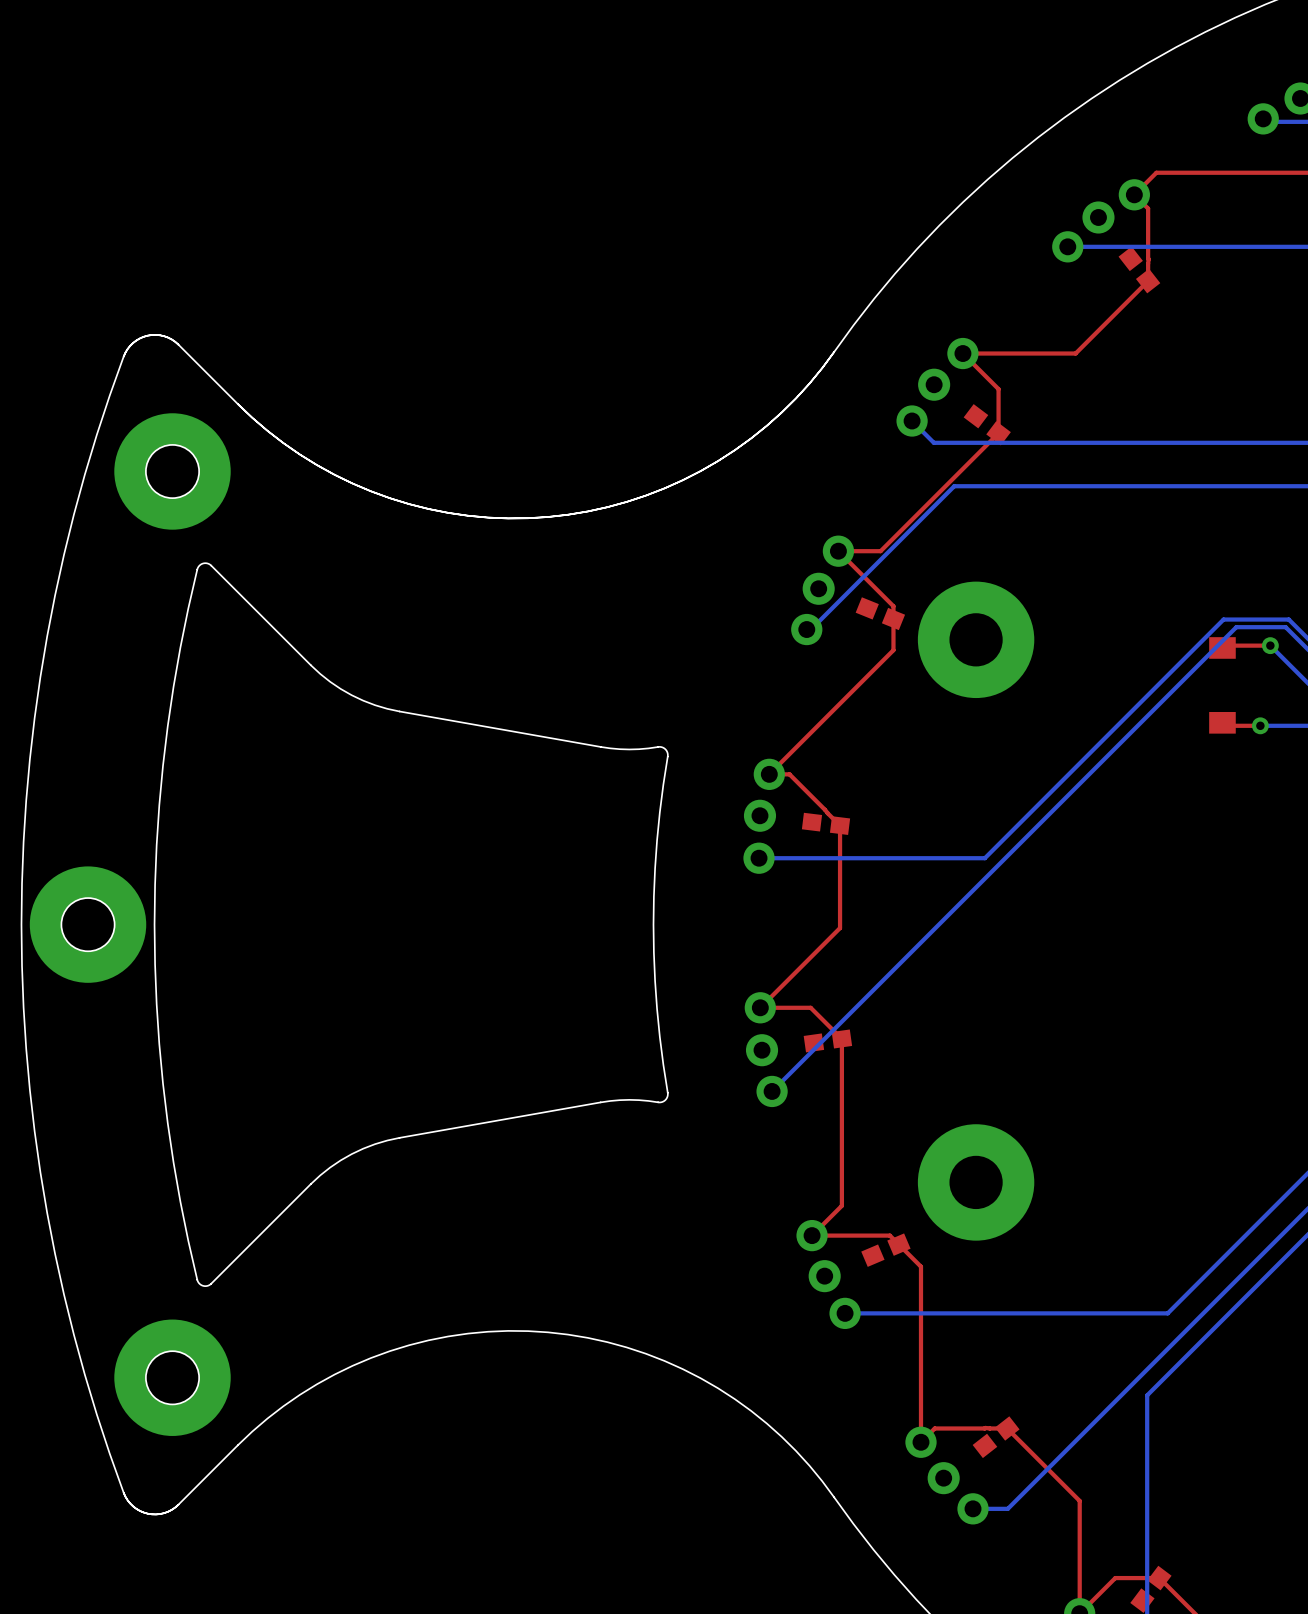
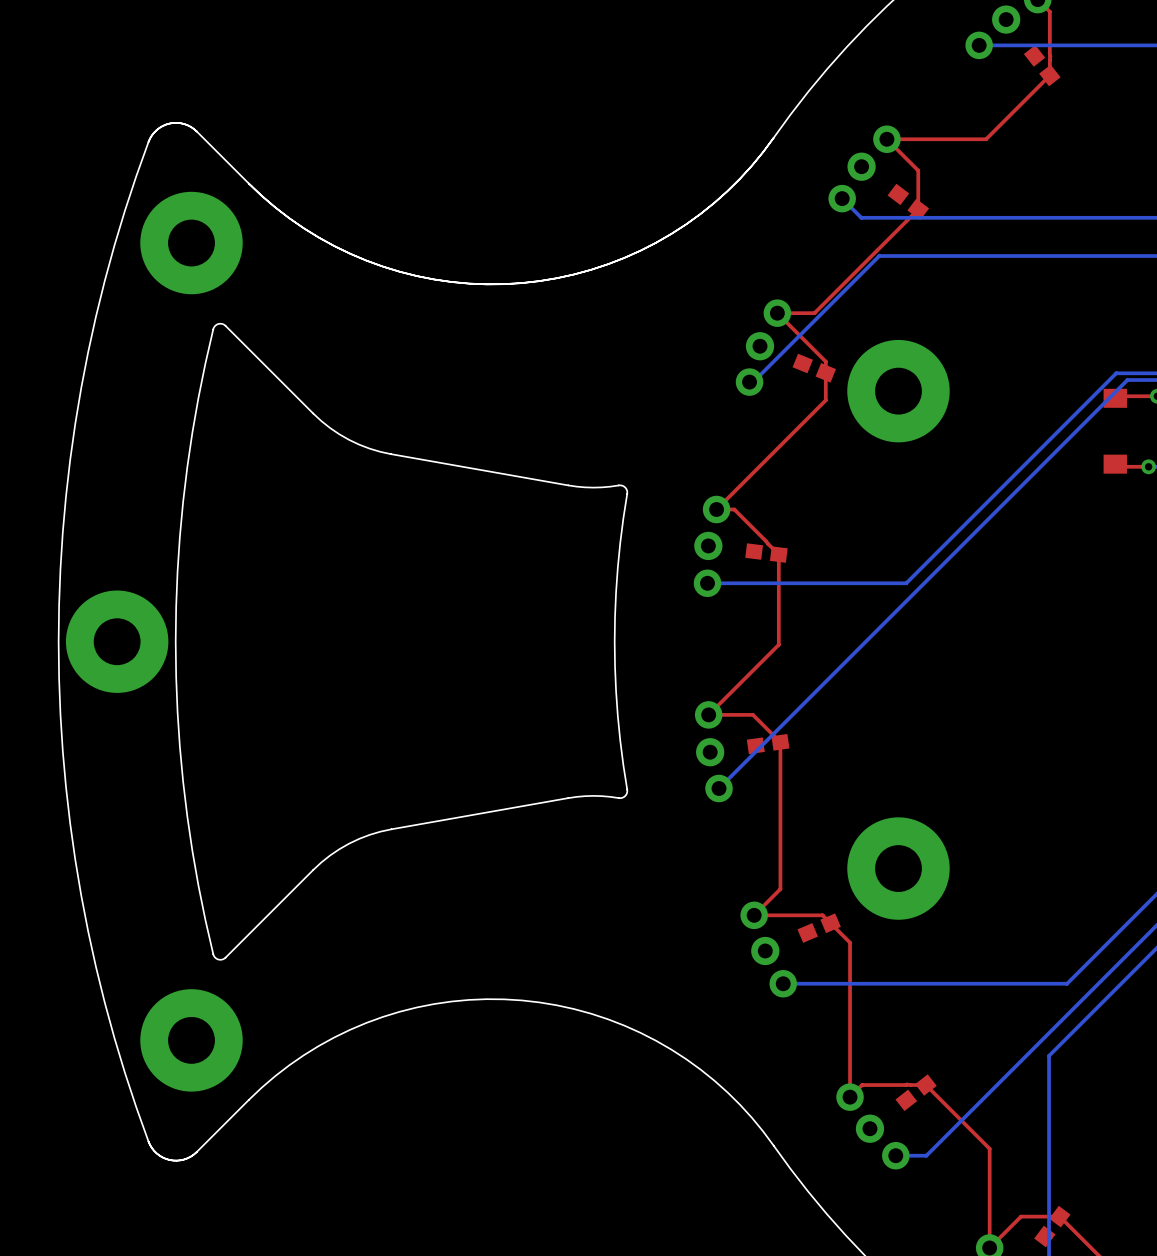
round board edge: [145, 444, 200, 499] -> none
round board edge: [61, 898, 115, 952] -> none
round board edge: [145, 1351, 200, 1405] -> none

